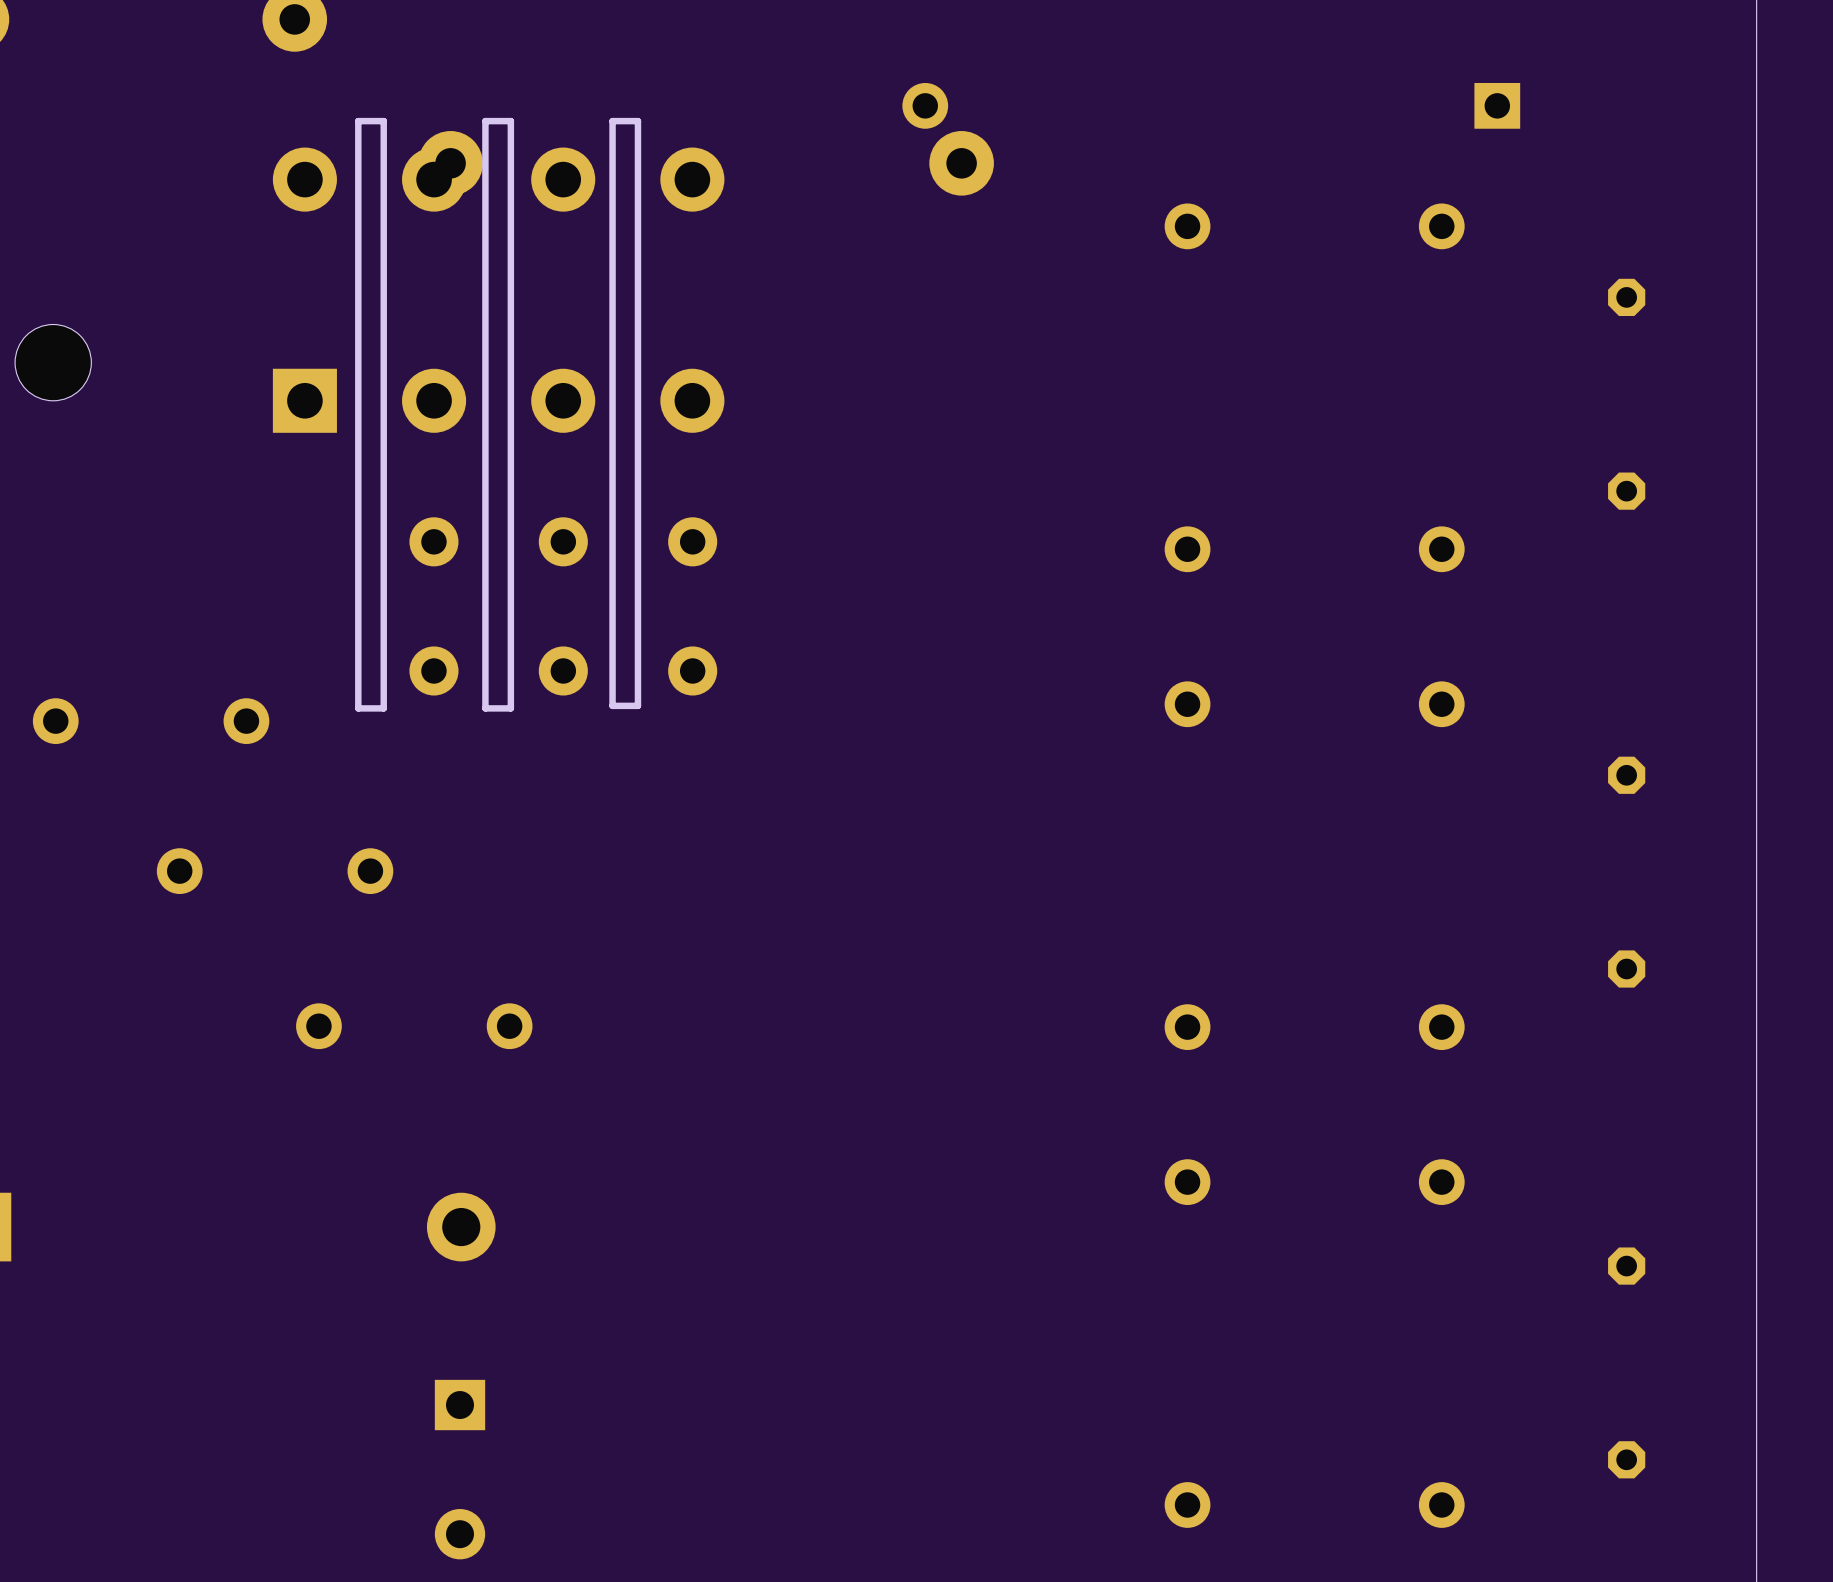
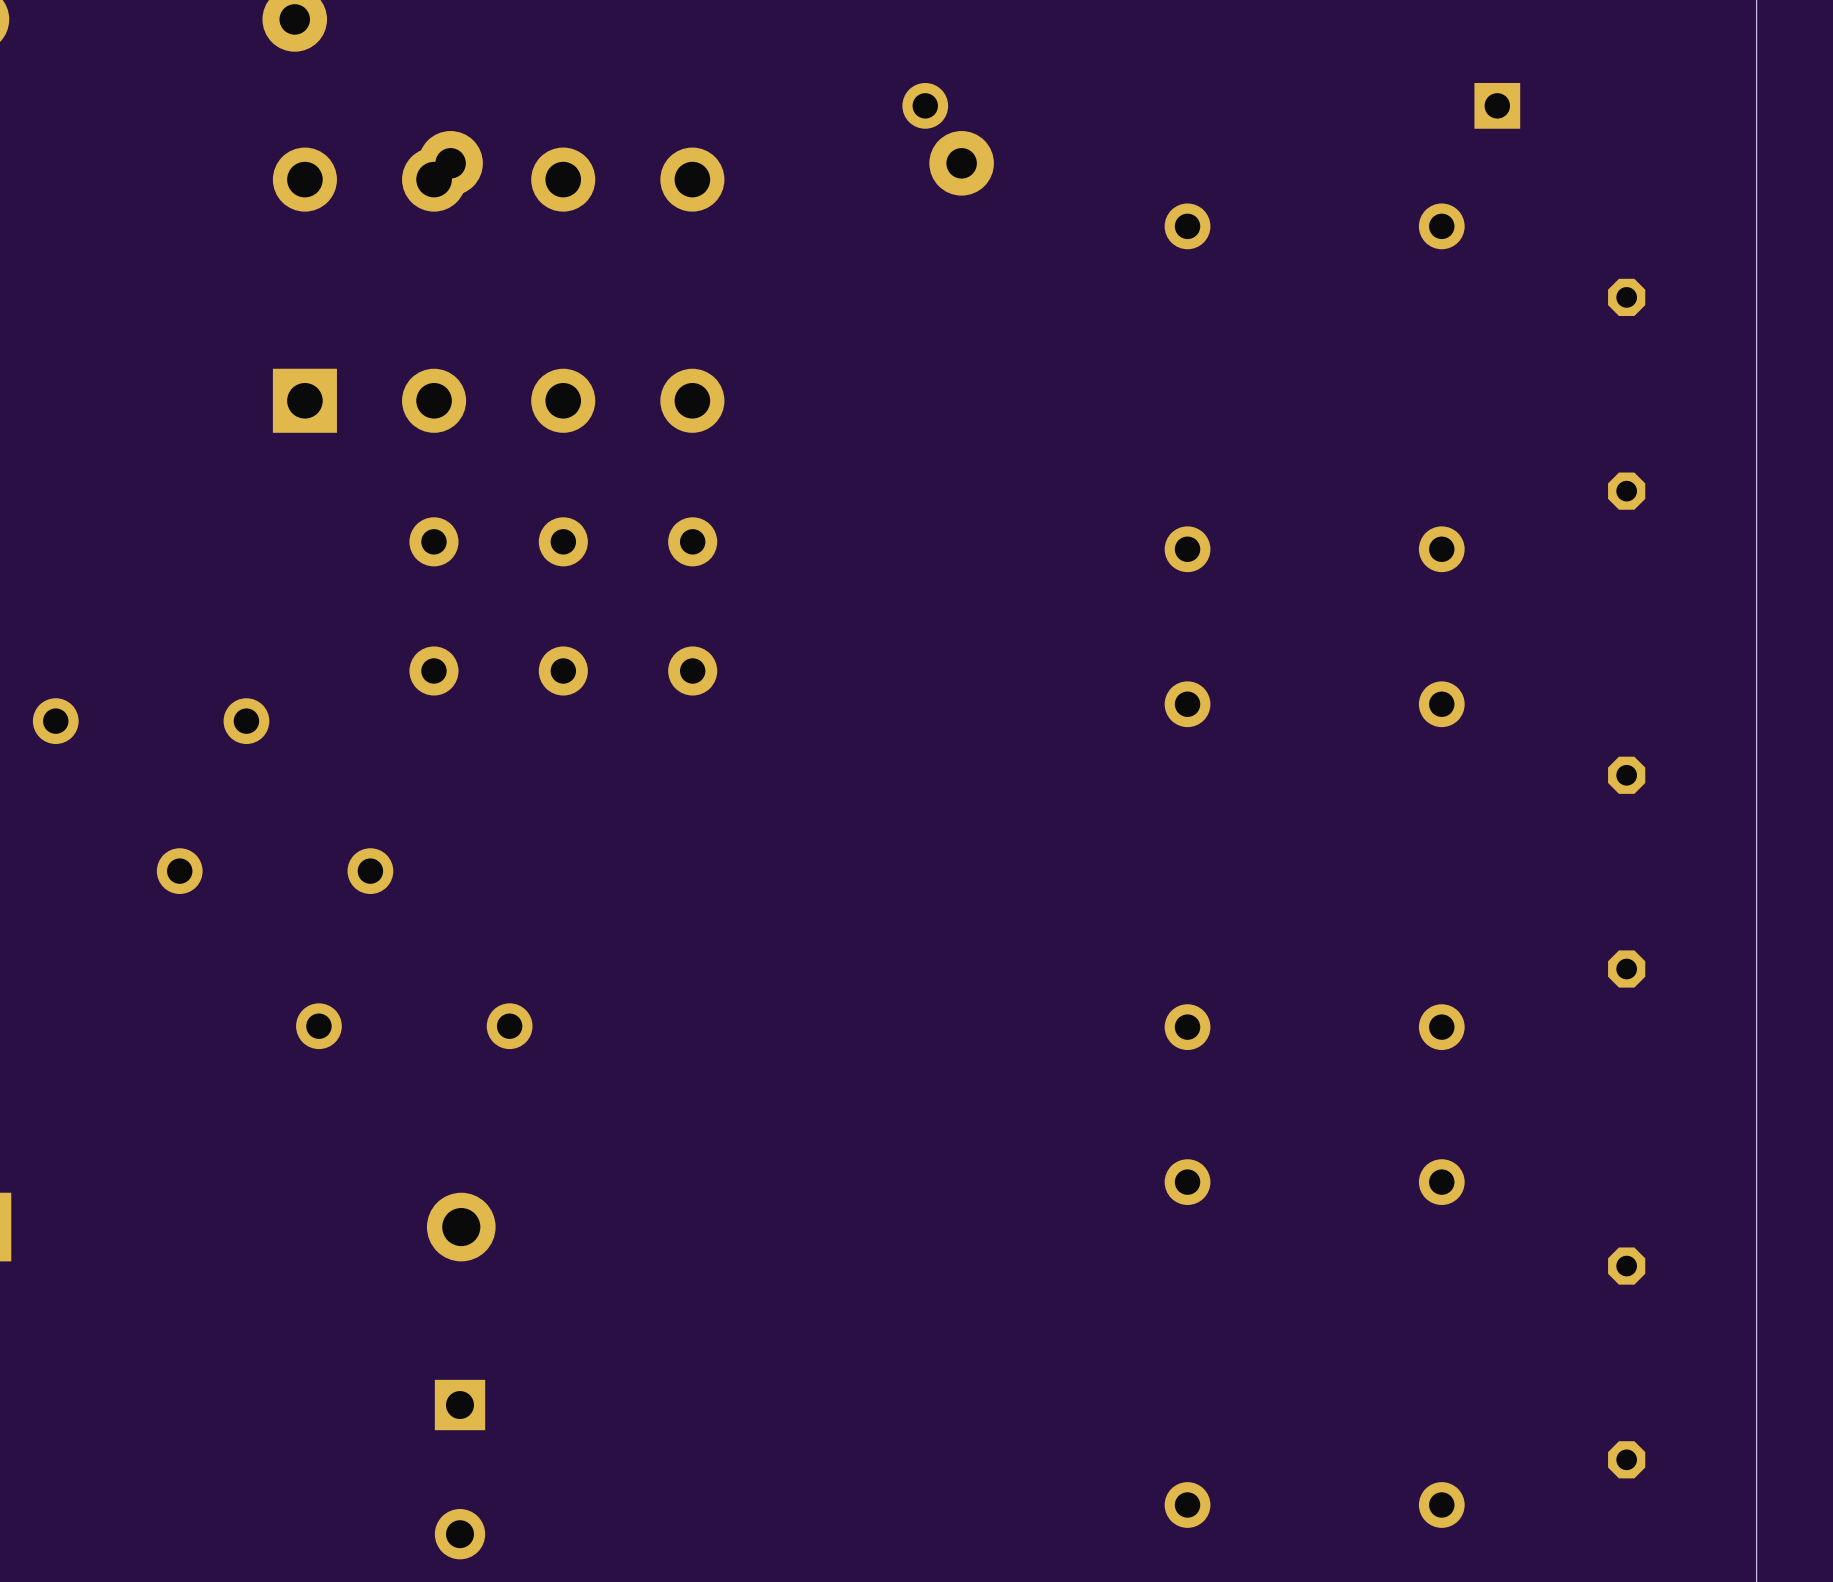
board edge: (383, 121) (358, 121) (358, 708) (383, 708) (383, 121) -> none
board edge: (510, 121) (485, 121) (485, 708) (510, 708) (510, 121) -> none
board edge: (637, 121) (612, 121) (612, 705) (637, 705) (637, 121) -> none
hole: (53, 362) -> none

